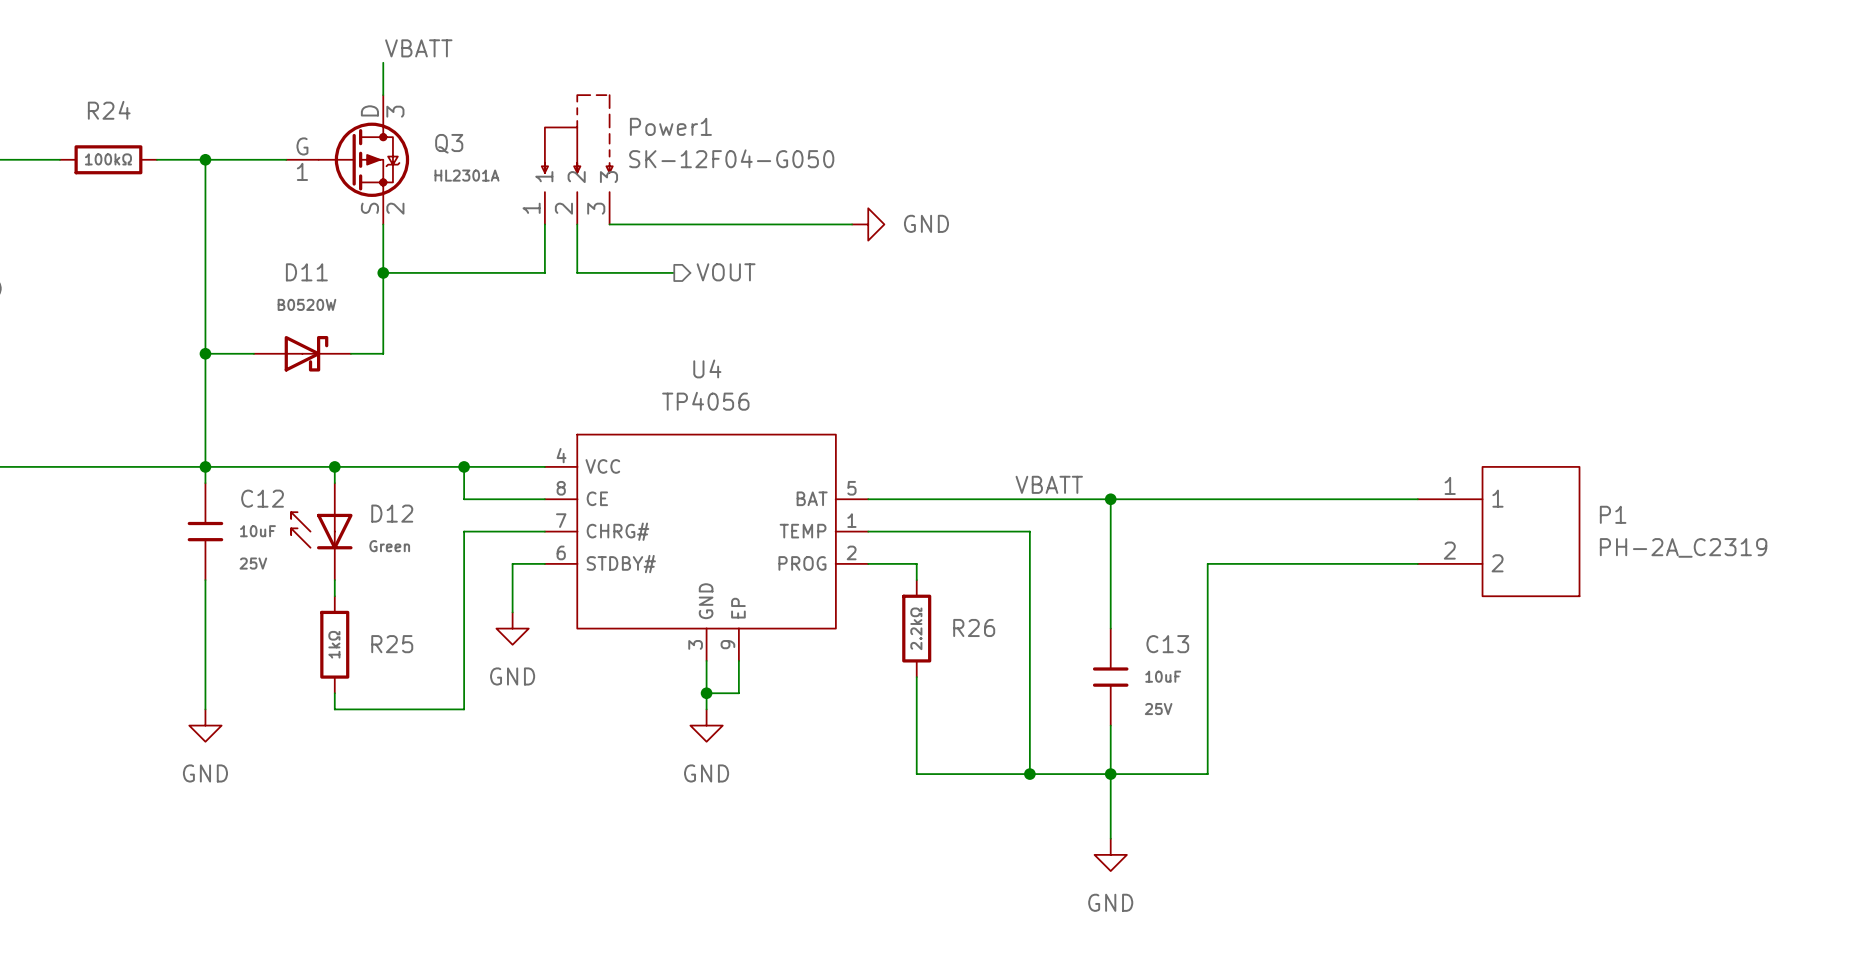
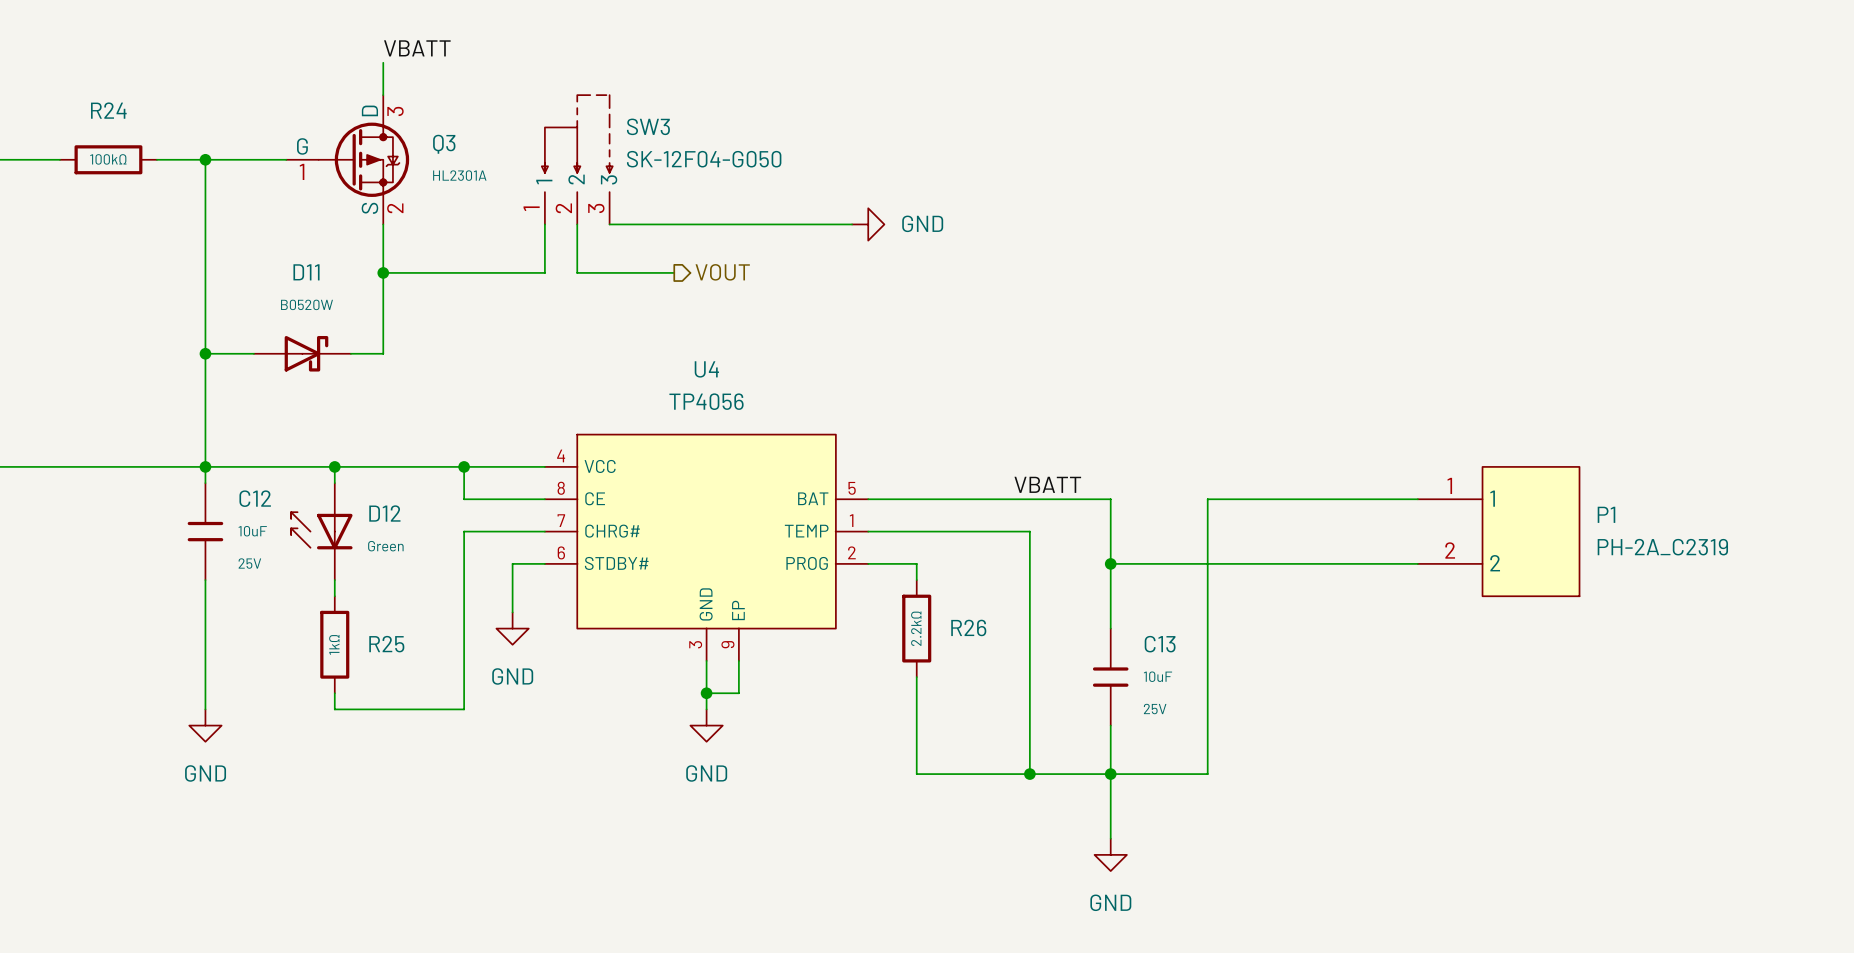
Power1 name: Power1 (670, 126) -> SW3 (648, 126)
wire: (1110, 499) (1207, 499) -> (1110, 563) (1207, 563) (1207, 499)
junction position: (1110, 499) -> (1110, 563)

